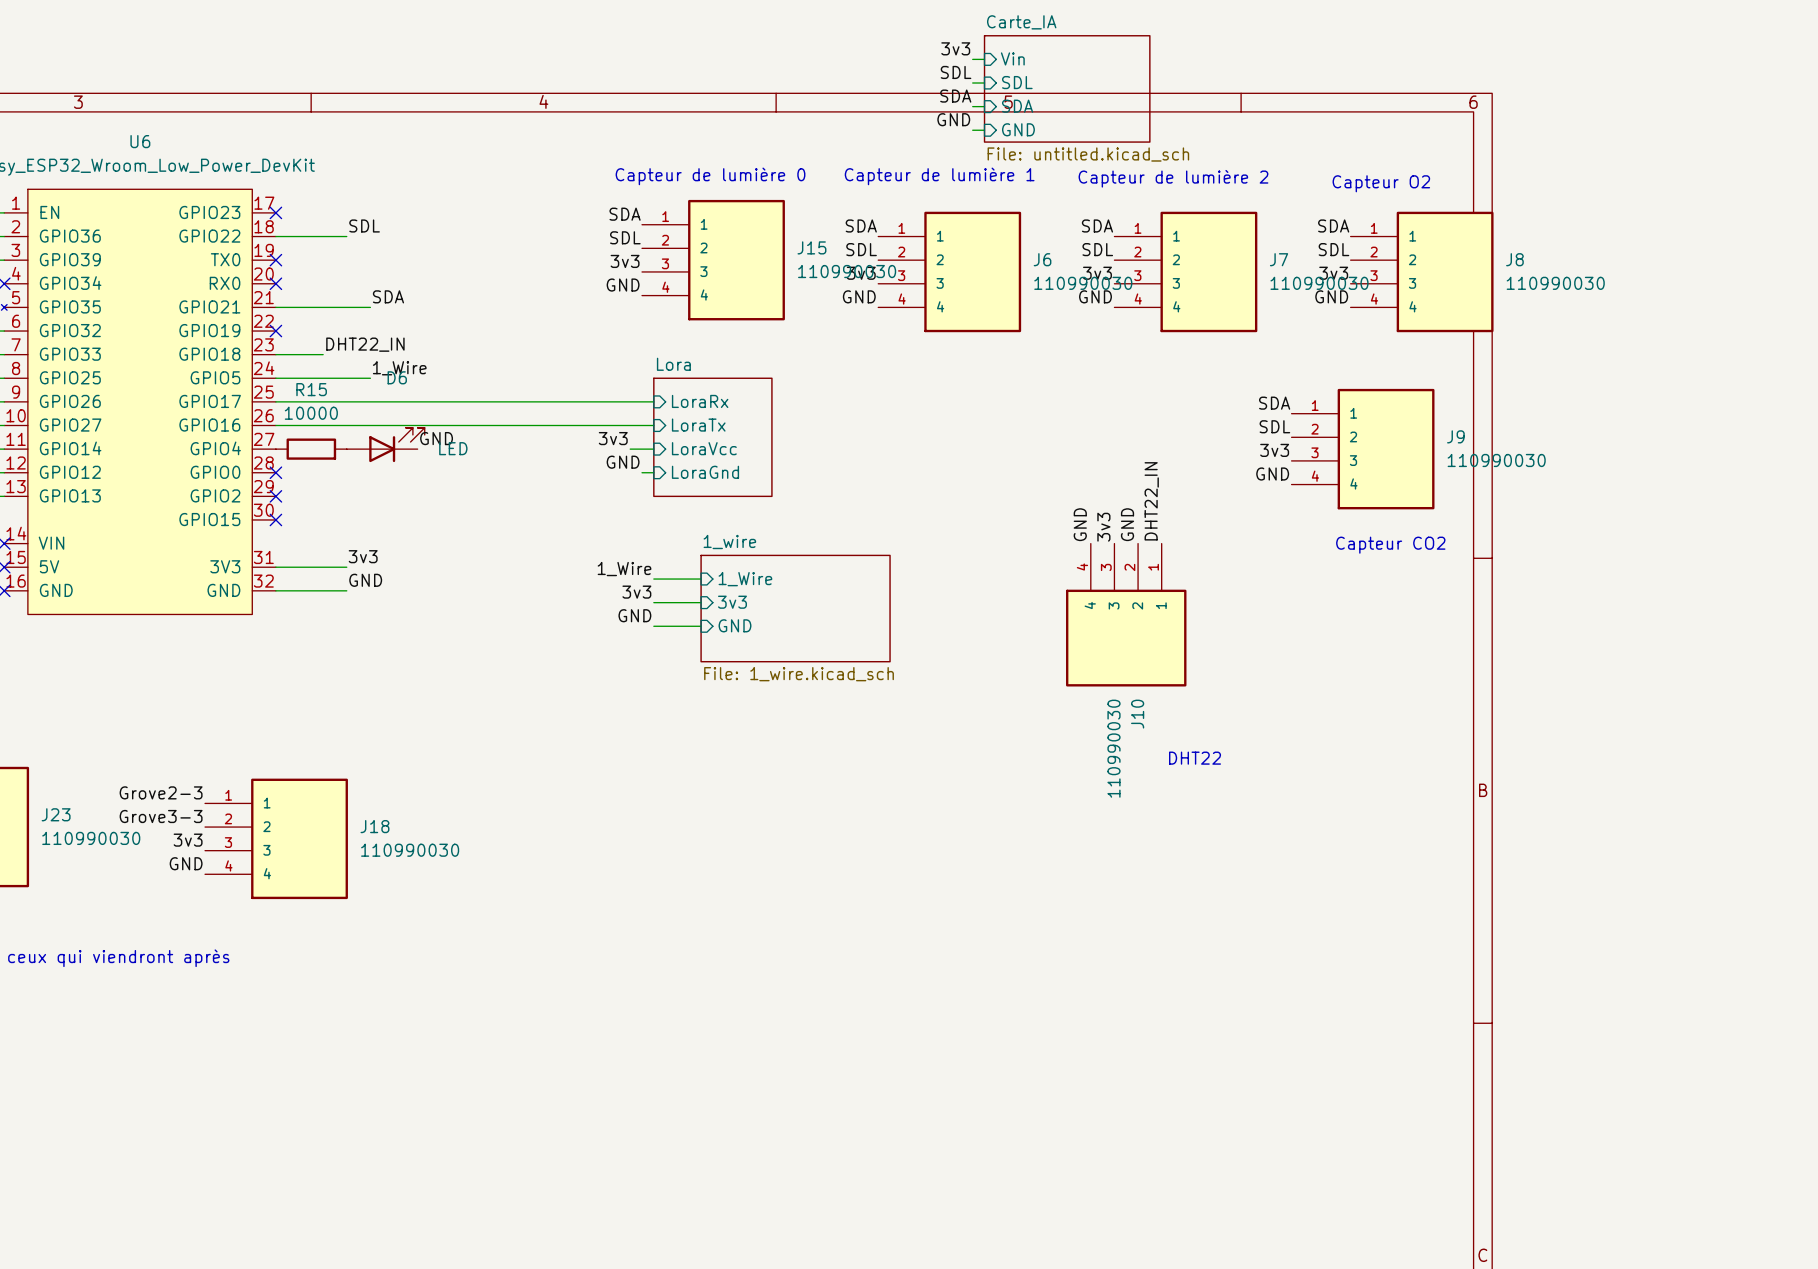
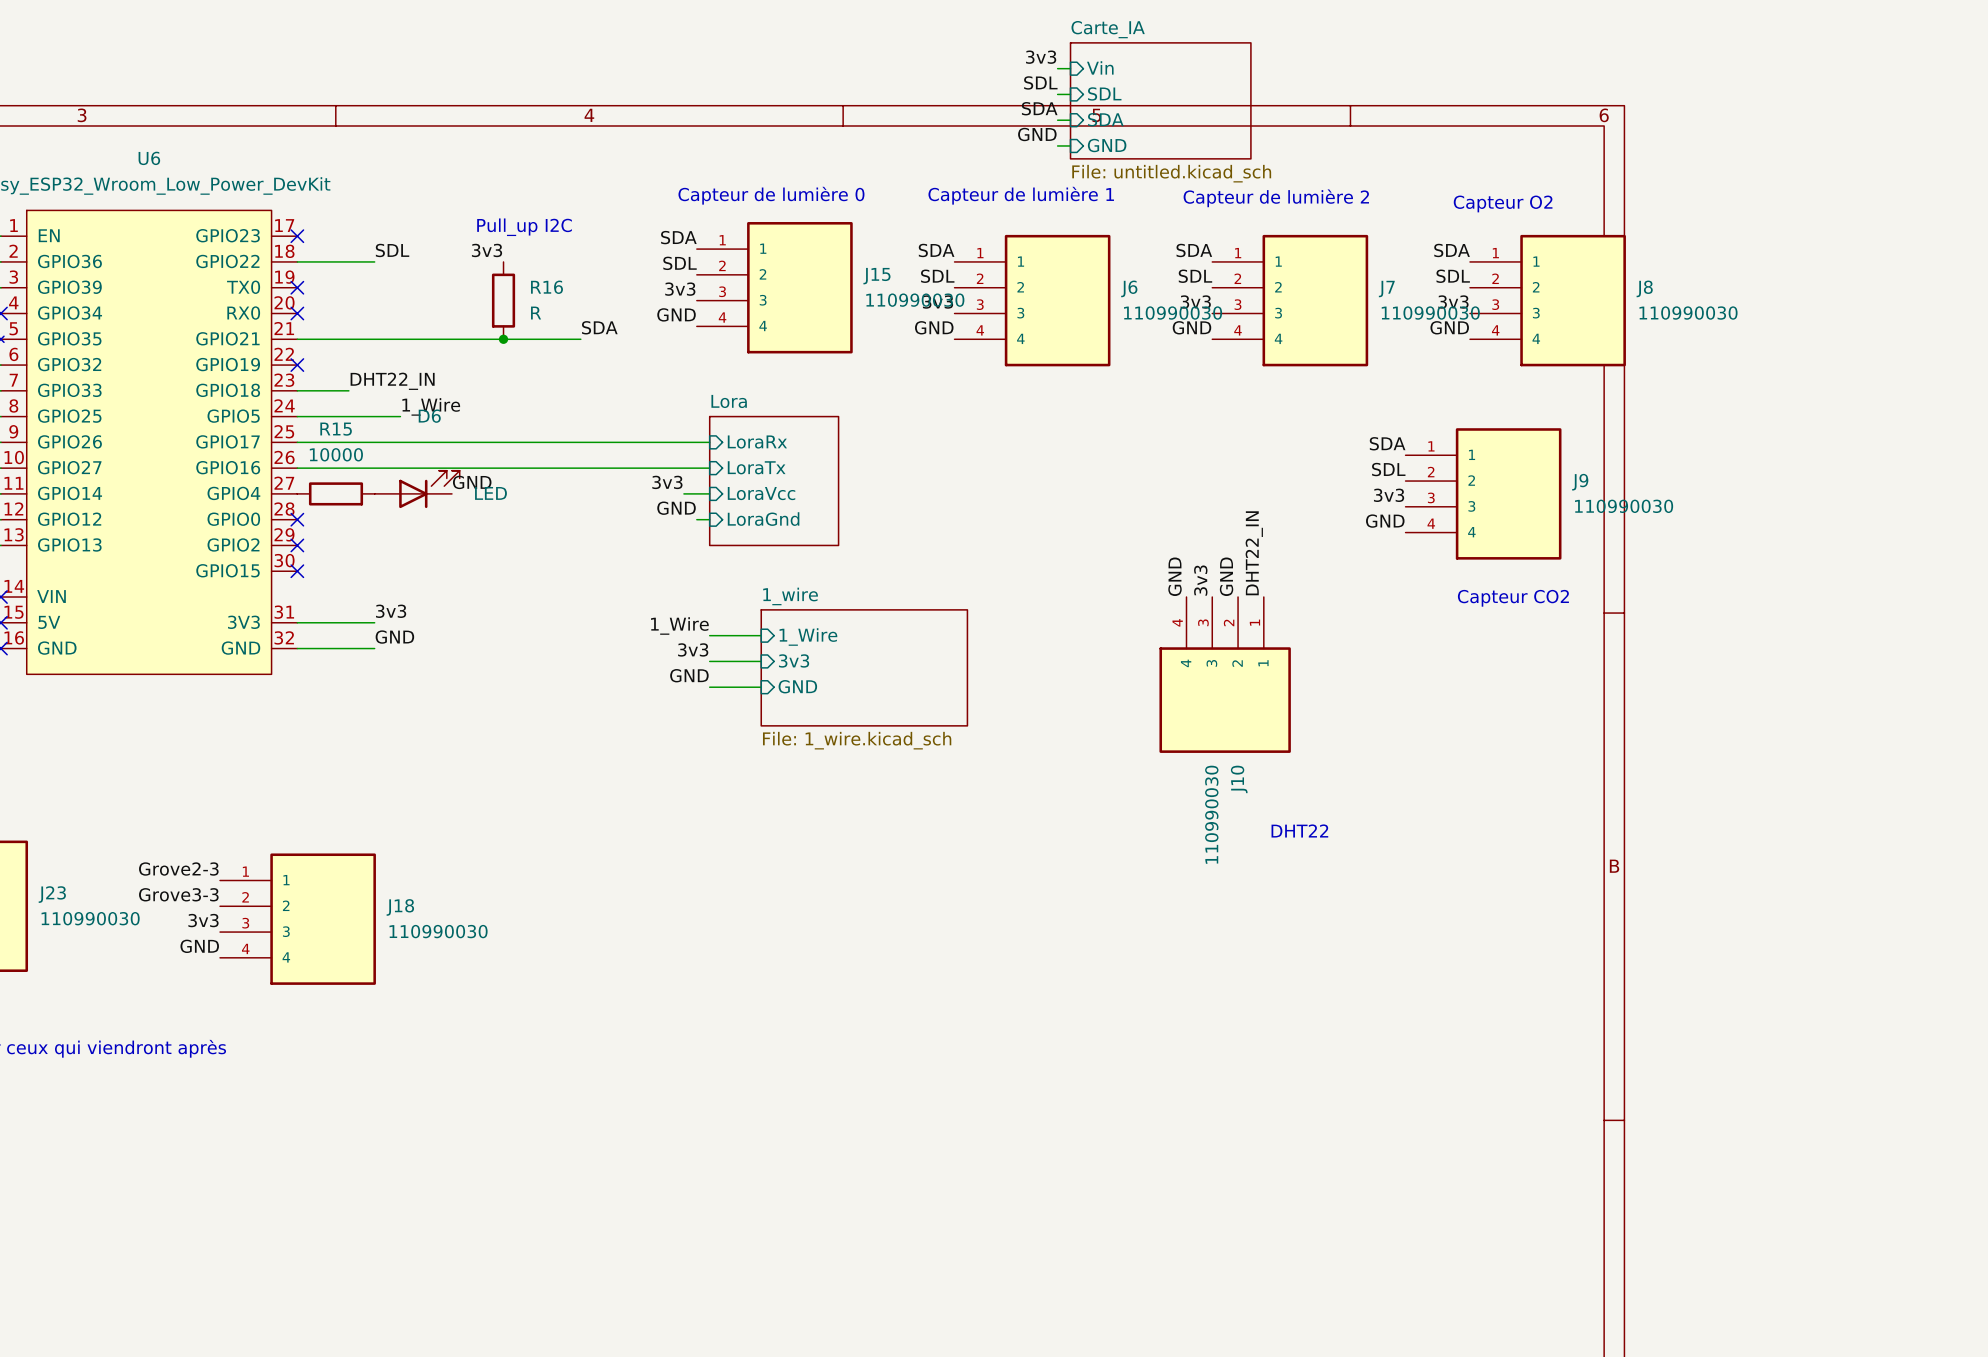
text: none -> Pull_up I2C (524, 227)
label: none -> 3v3 (487, 250)
R16: none -> R (503, 300)
label position: SDA (388, 296) -> SDA (599, 327)
wire: none -> (400, 339) (580, 339)
junction: none -> (503, 339)

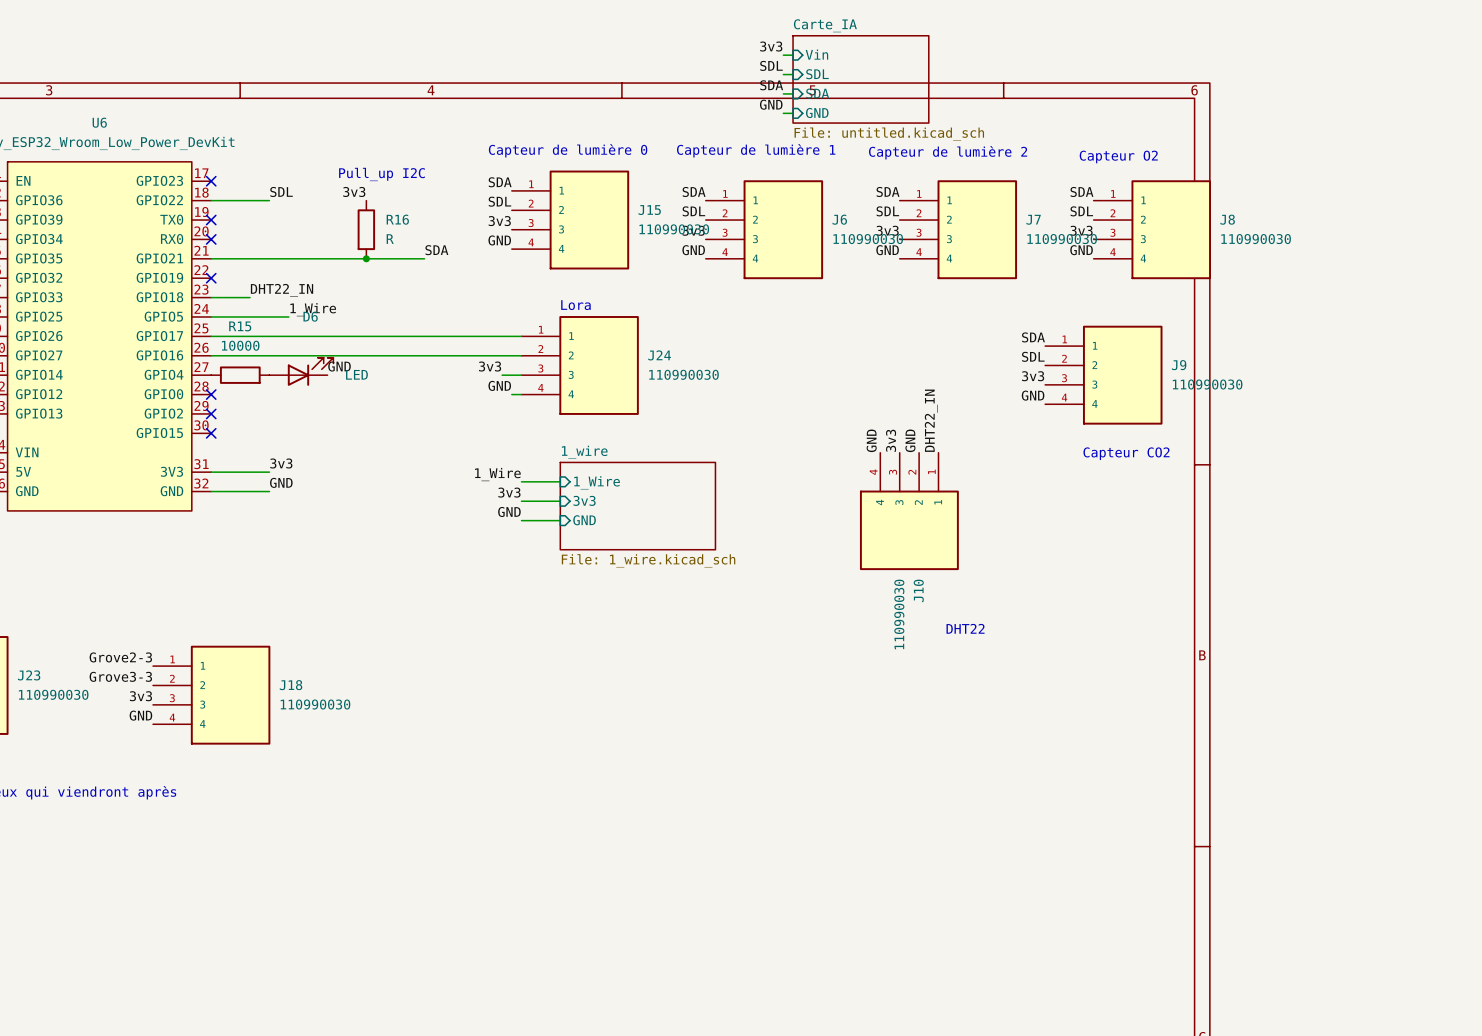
text: none -> Lora (575, 305)
sheet pin: LoraRx (757, 442) -> none
sheet pin: LoraTx (756, 467) -> none
sheet Lora: (774, 481) -> none
J24: none -> 110990030 (580, 365)
sheet pin: LoraVcc (761, 493) -> none
sheet pin: LoraGnd (763, 519) -> none

